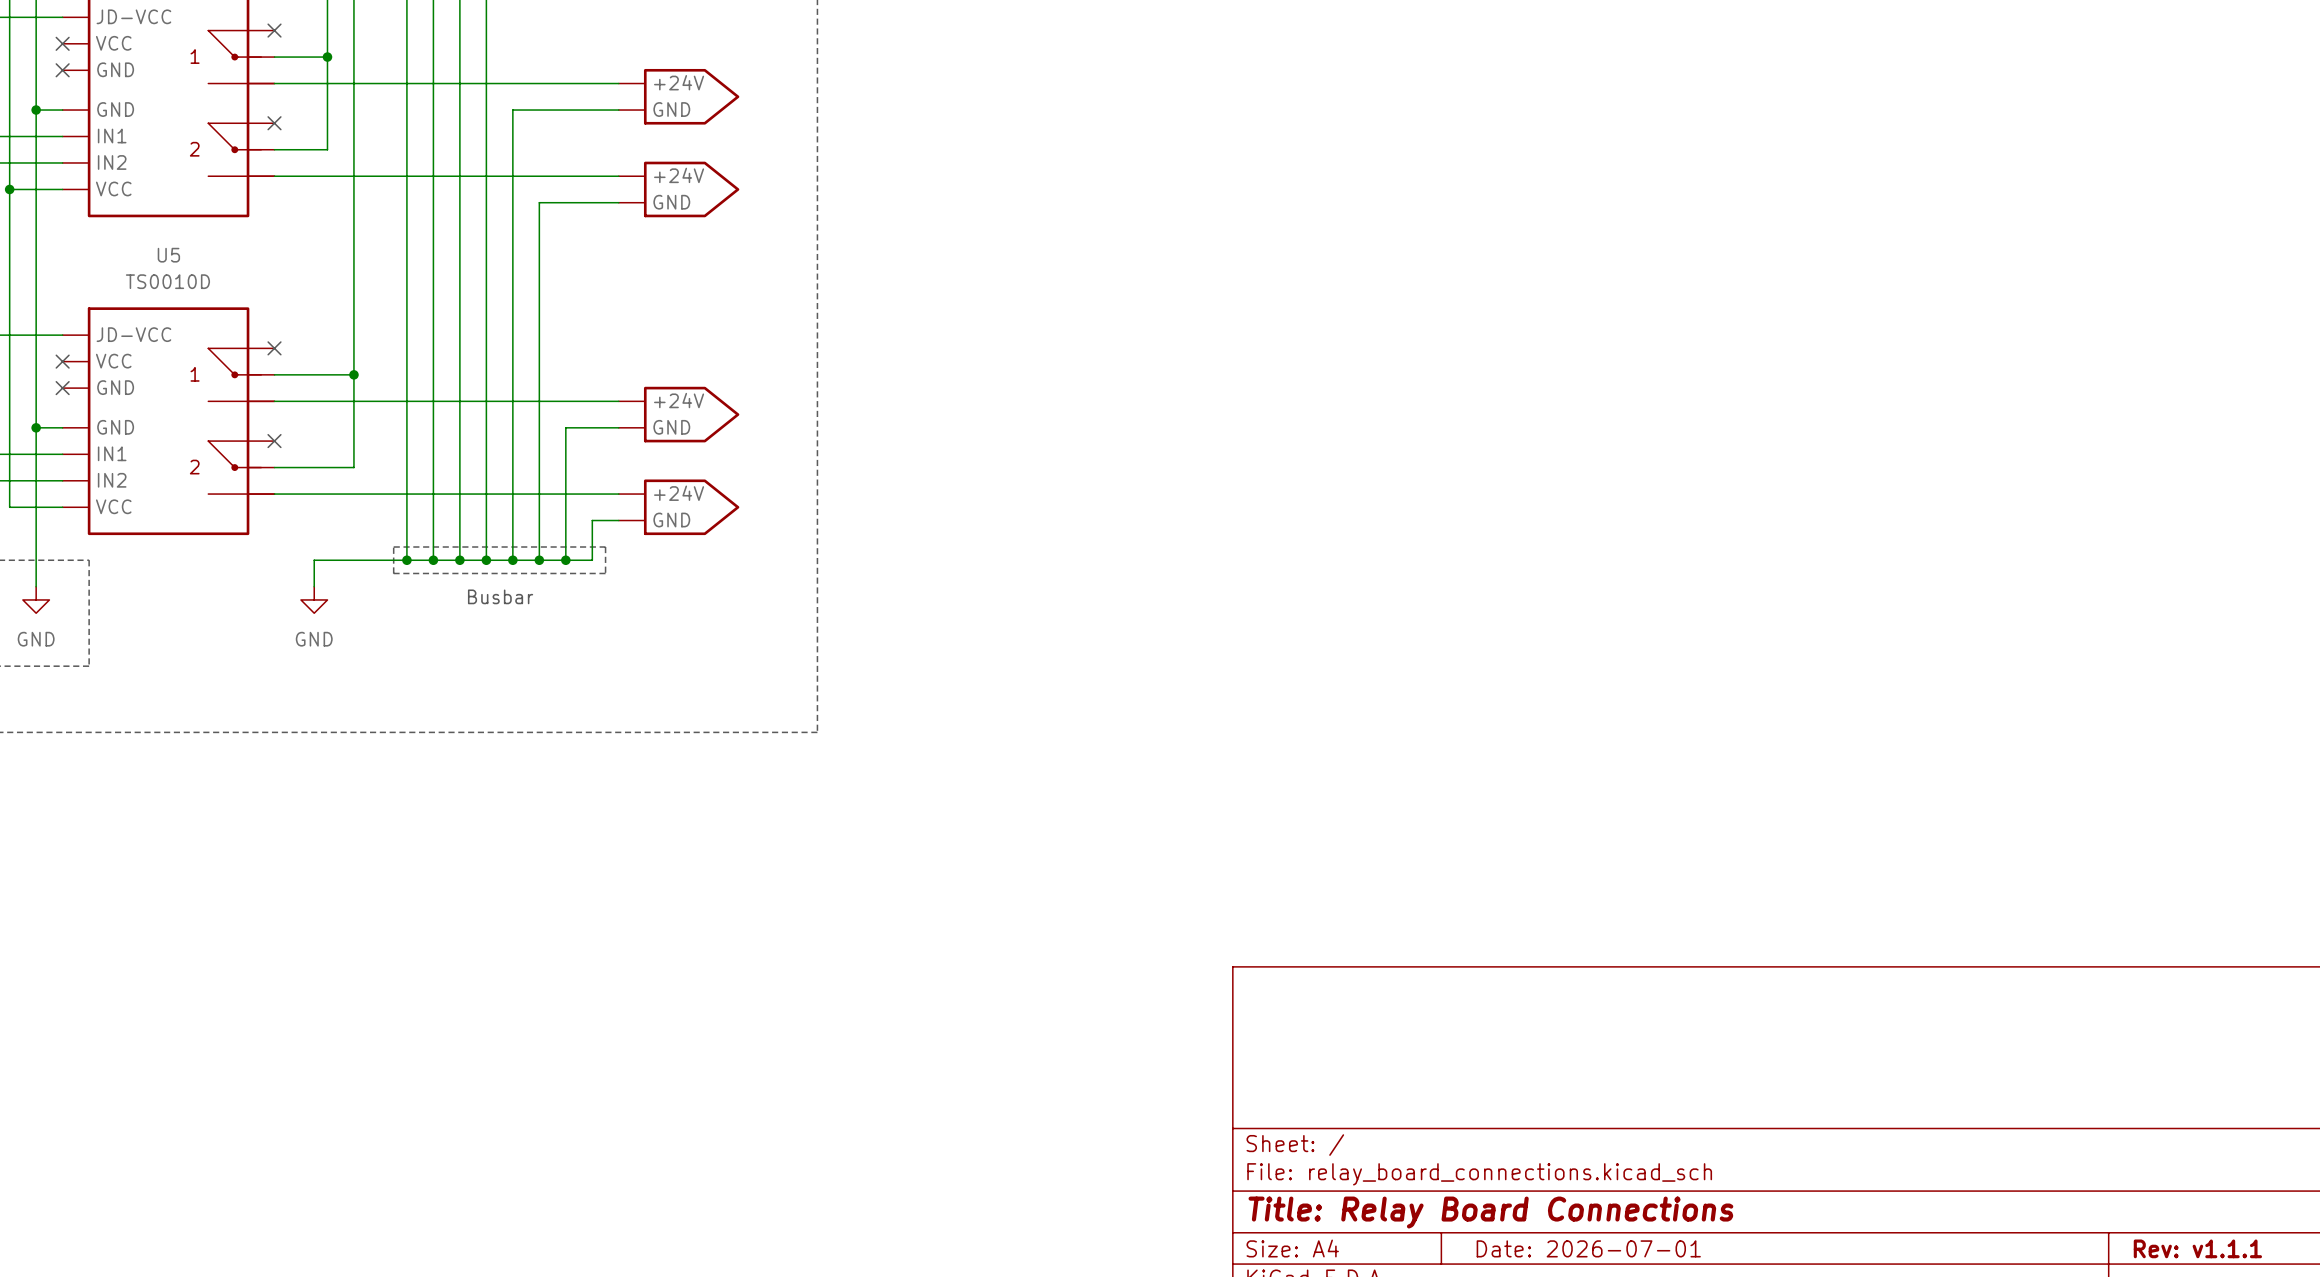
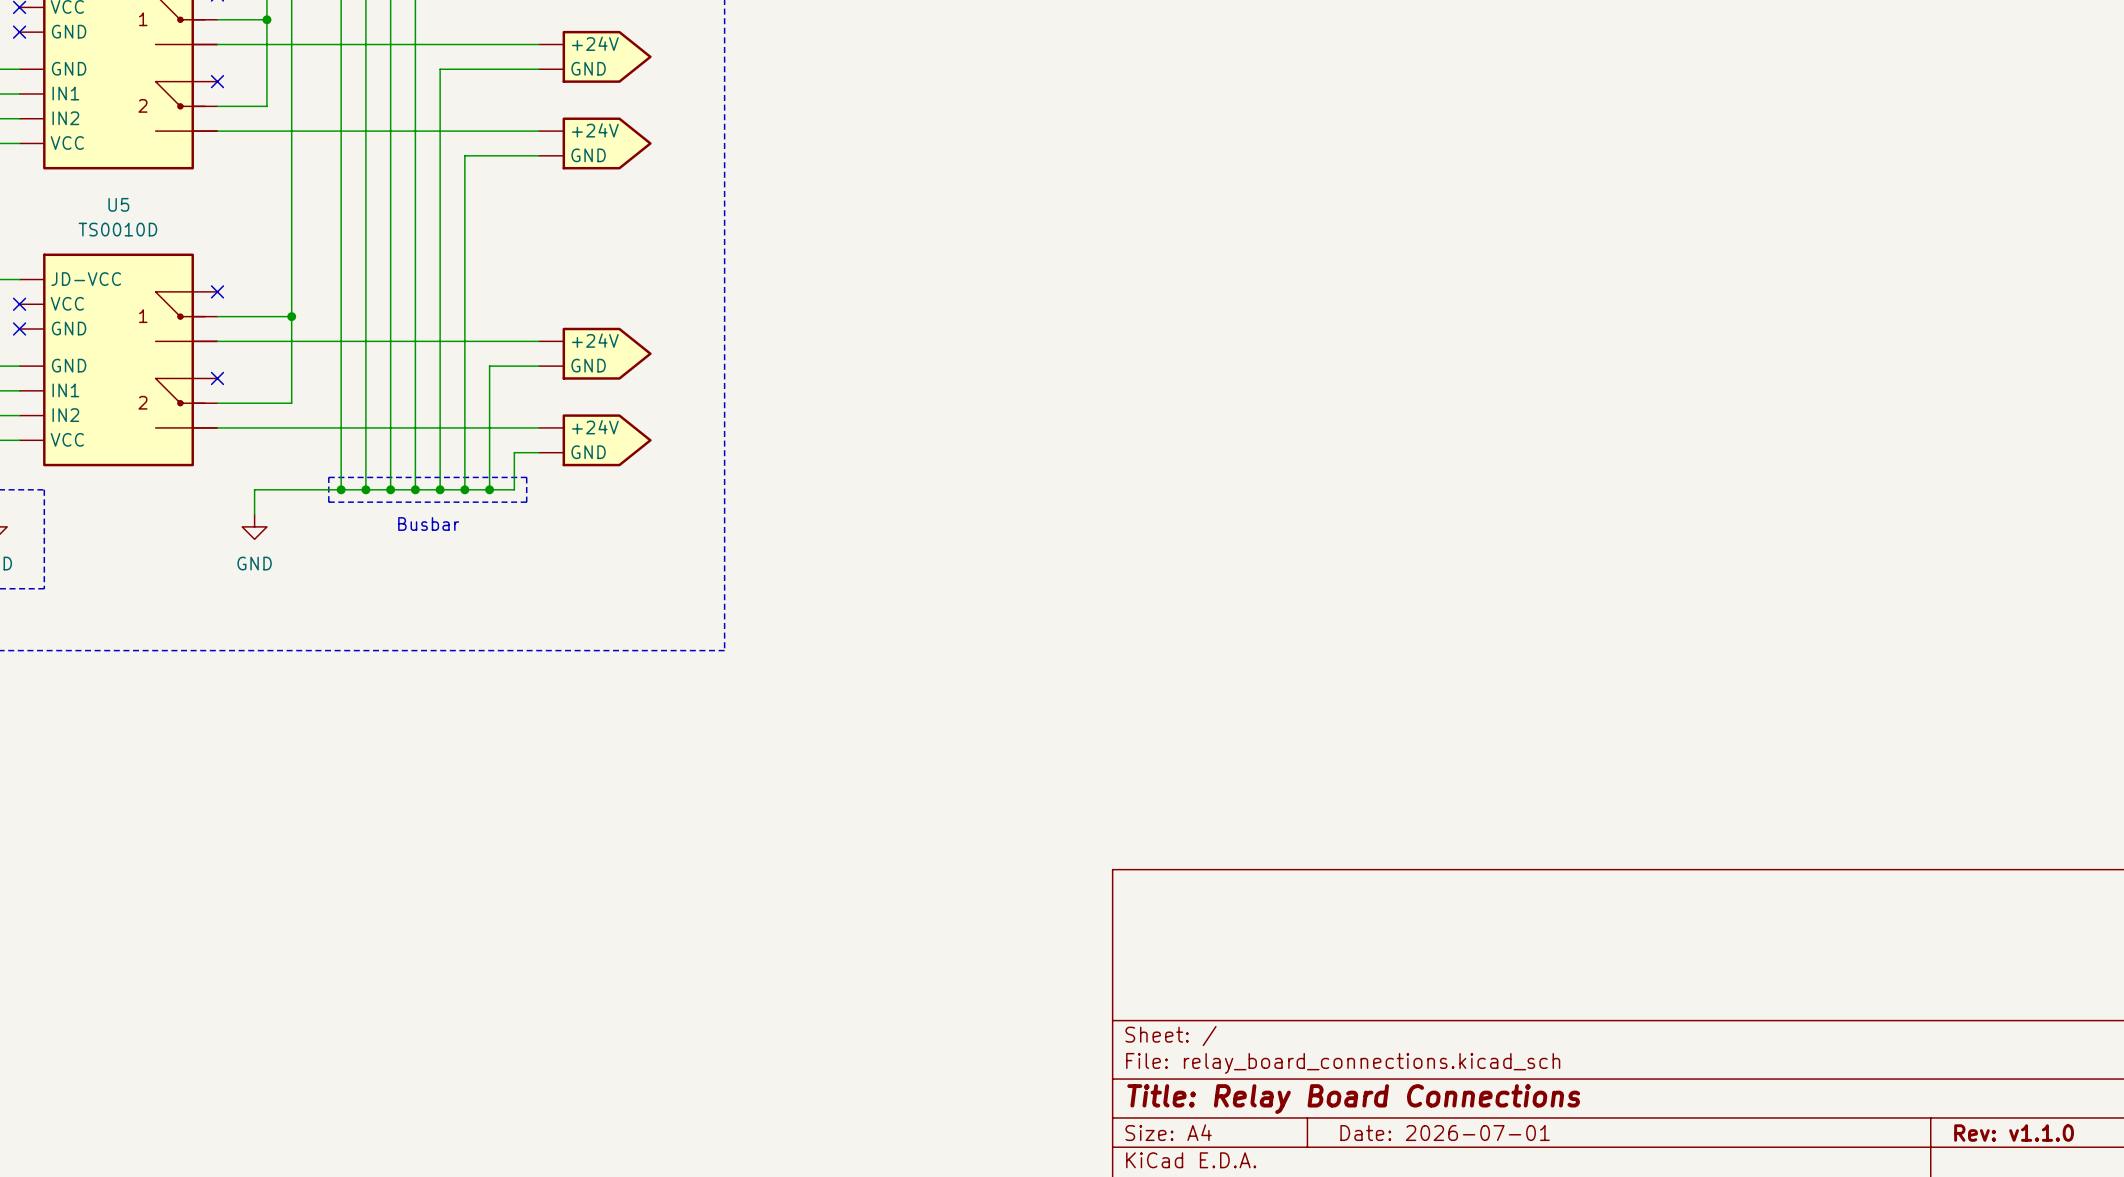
title block: Rev: v1.1.1 (2197, 1248) -> Rev: v1.1.0 (2014, 1133)

